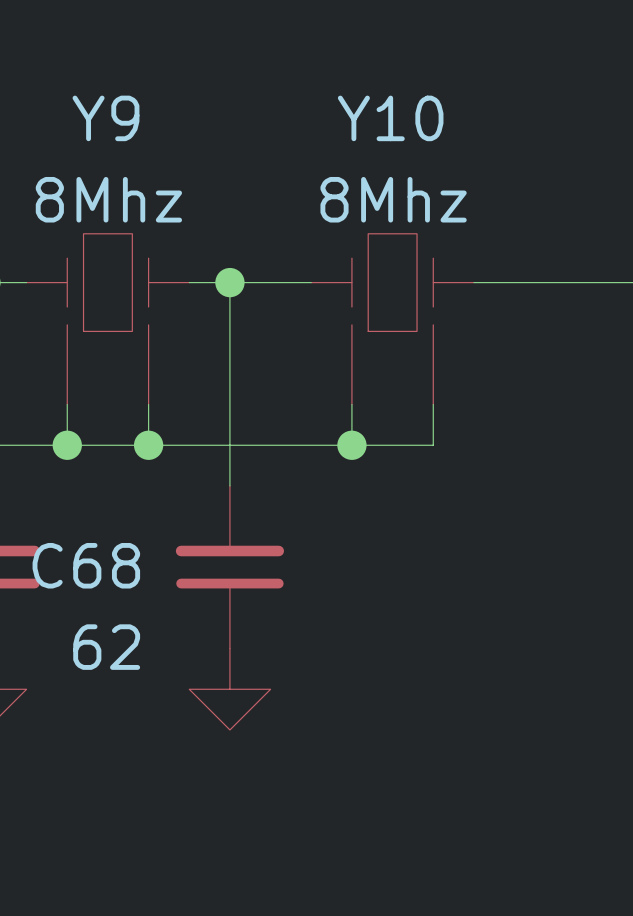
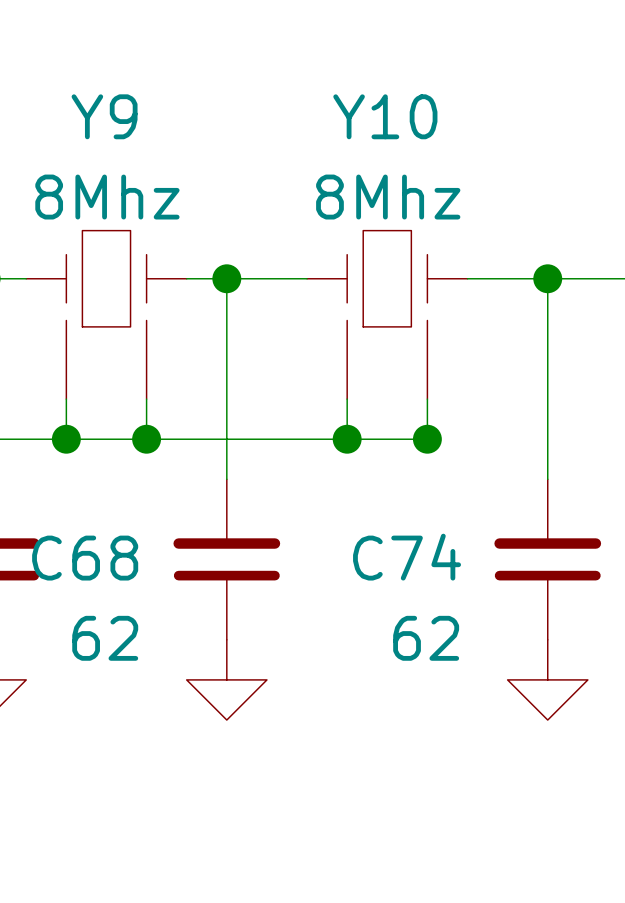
wire: none -> (547, 278) (547, 479)
junction: none -> (547, 278)
junction: none -> (427, 439)
C74: none -> 62 (547, 559)
power symbol: none -> (547, 679)

